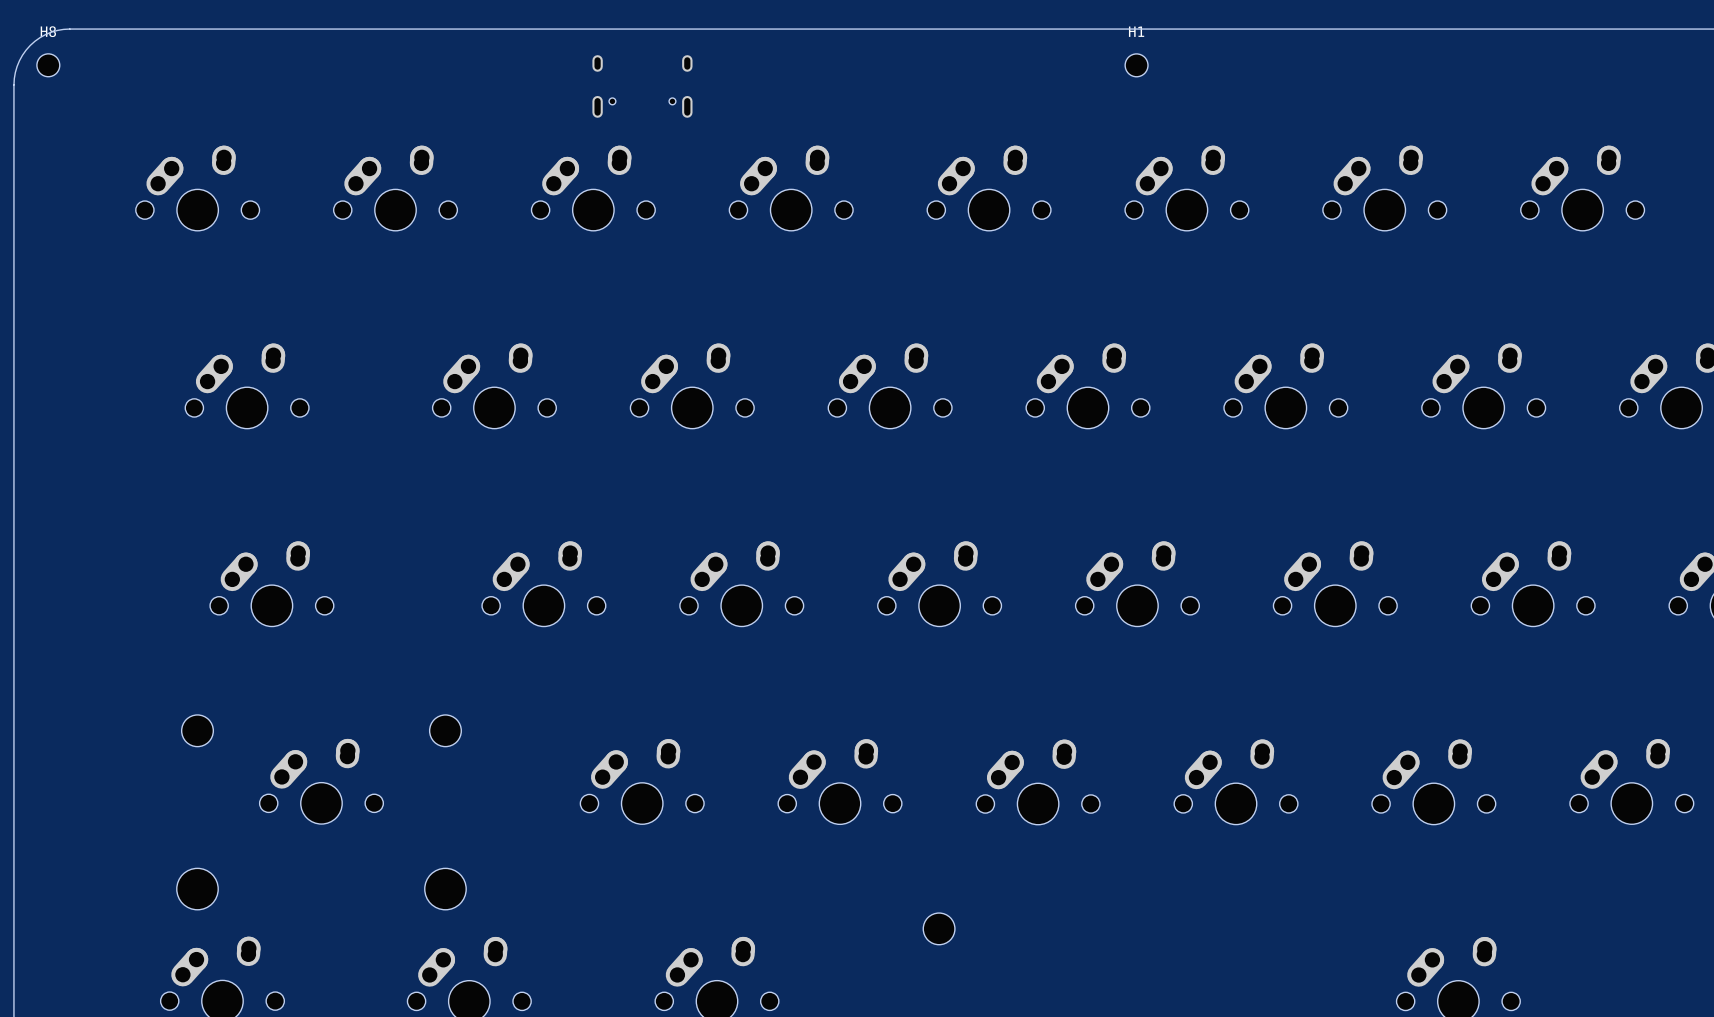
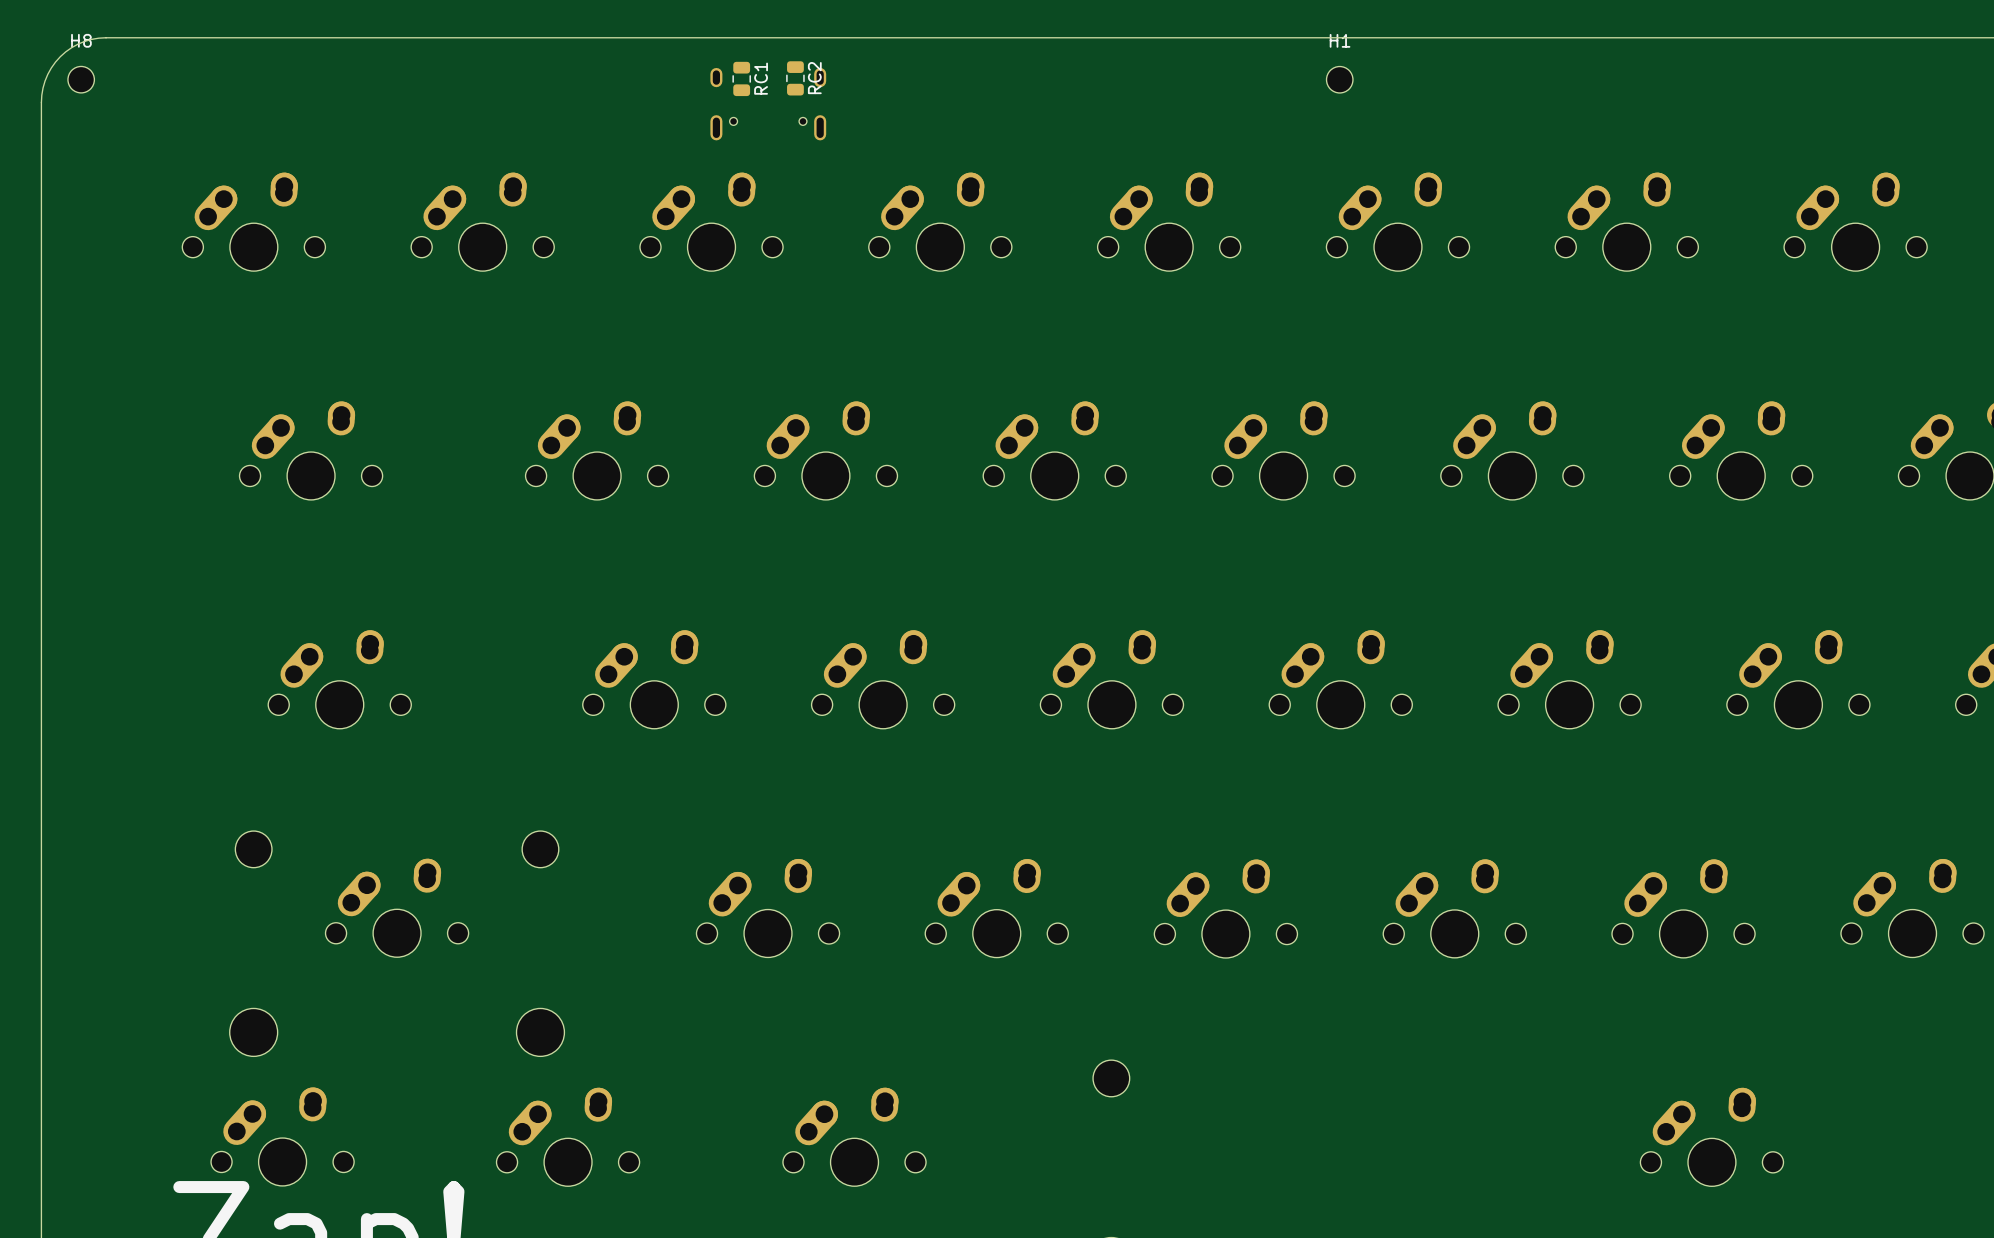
RC1: none -> (741, 78)
RC2: none -> (795, 78)

